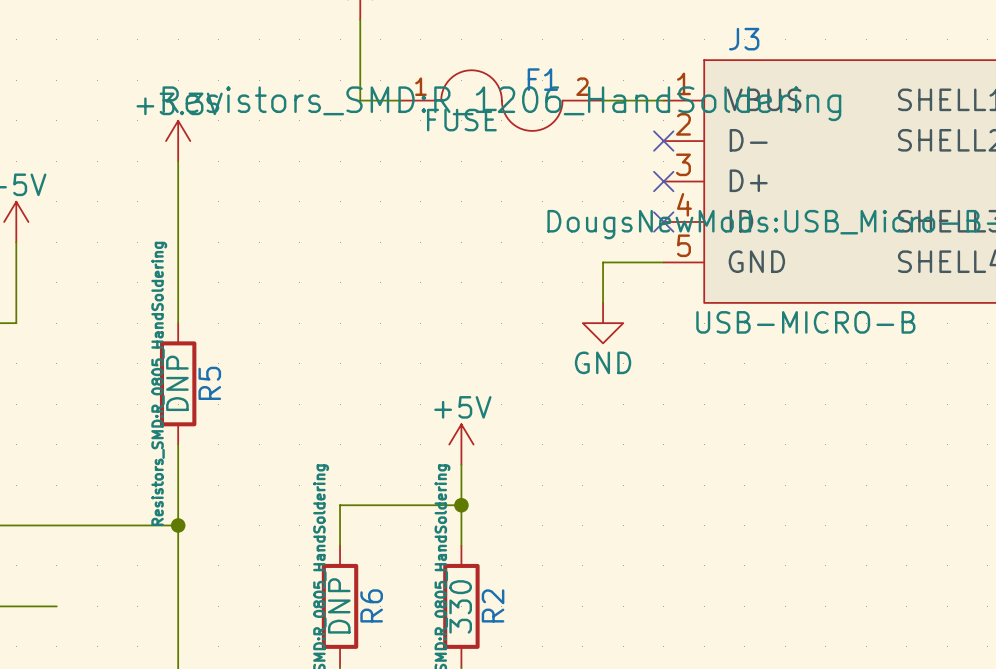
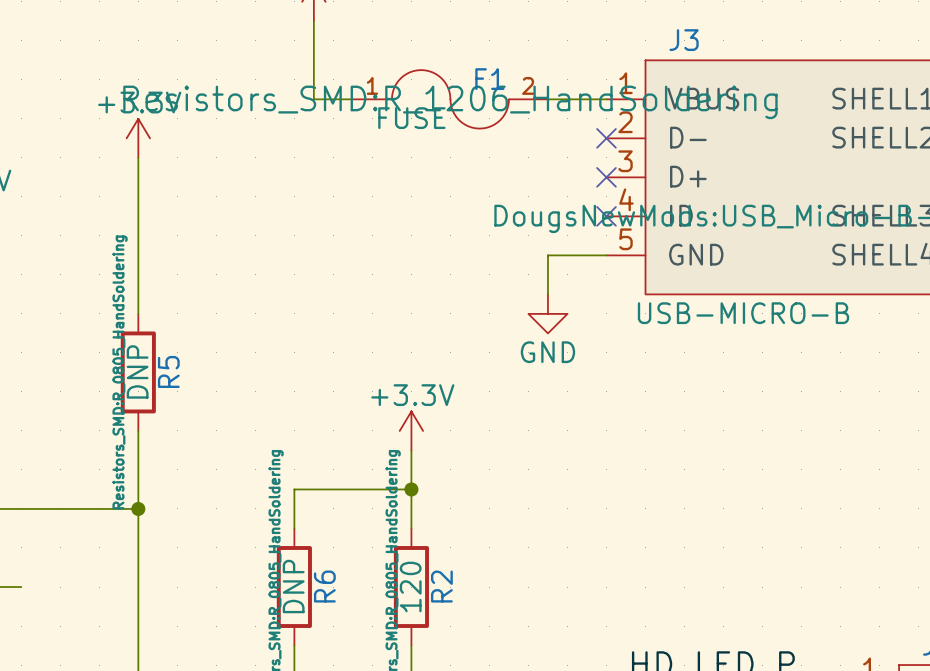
power symbol: +5V (461, 444) -> +3.3V (411, 430)
R2 value: 330 (460, 606) -> 120 (410, 587)

